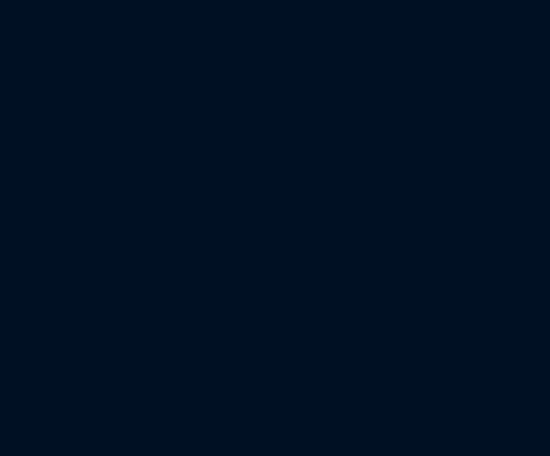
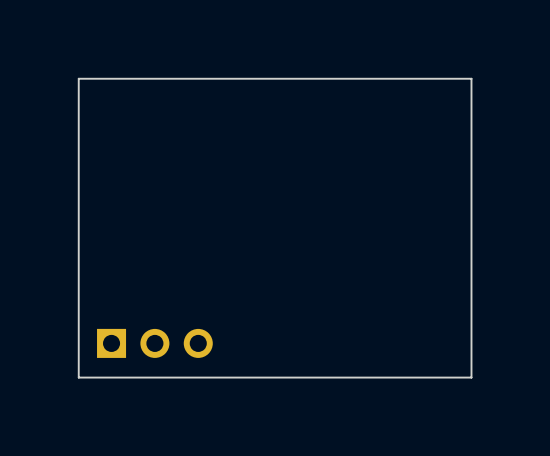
board edge: none -> (471, 78) (78, 78) (78, 377) (471, 377) (471, 78)
part: none -> (154, 343)

